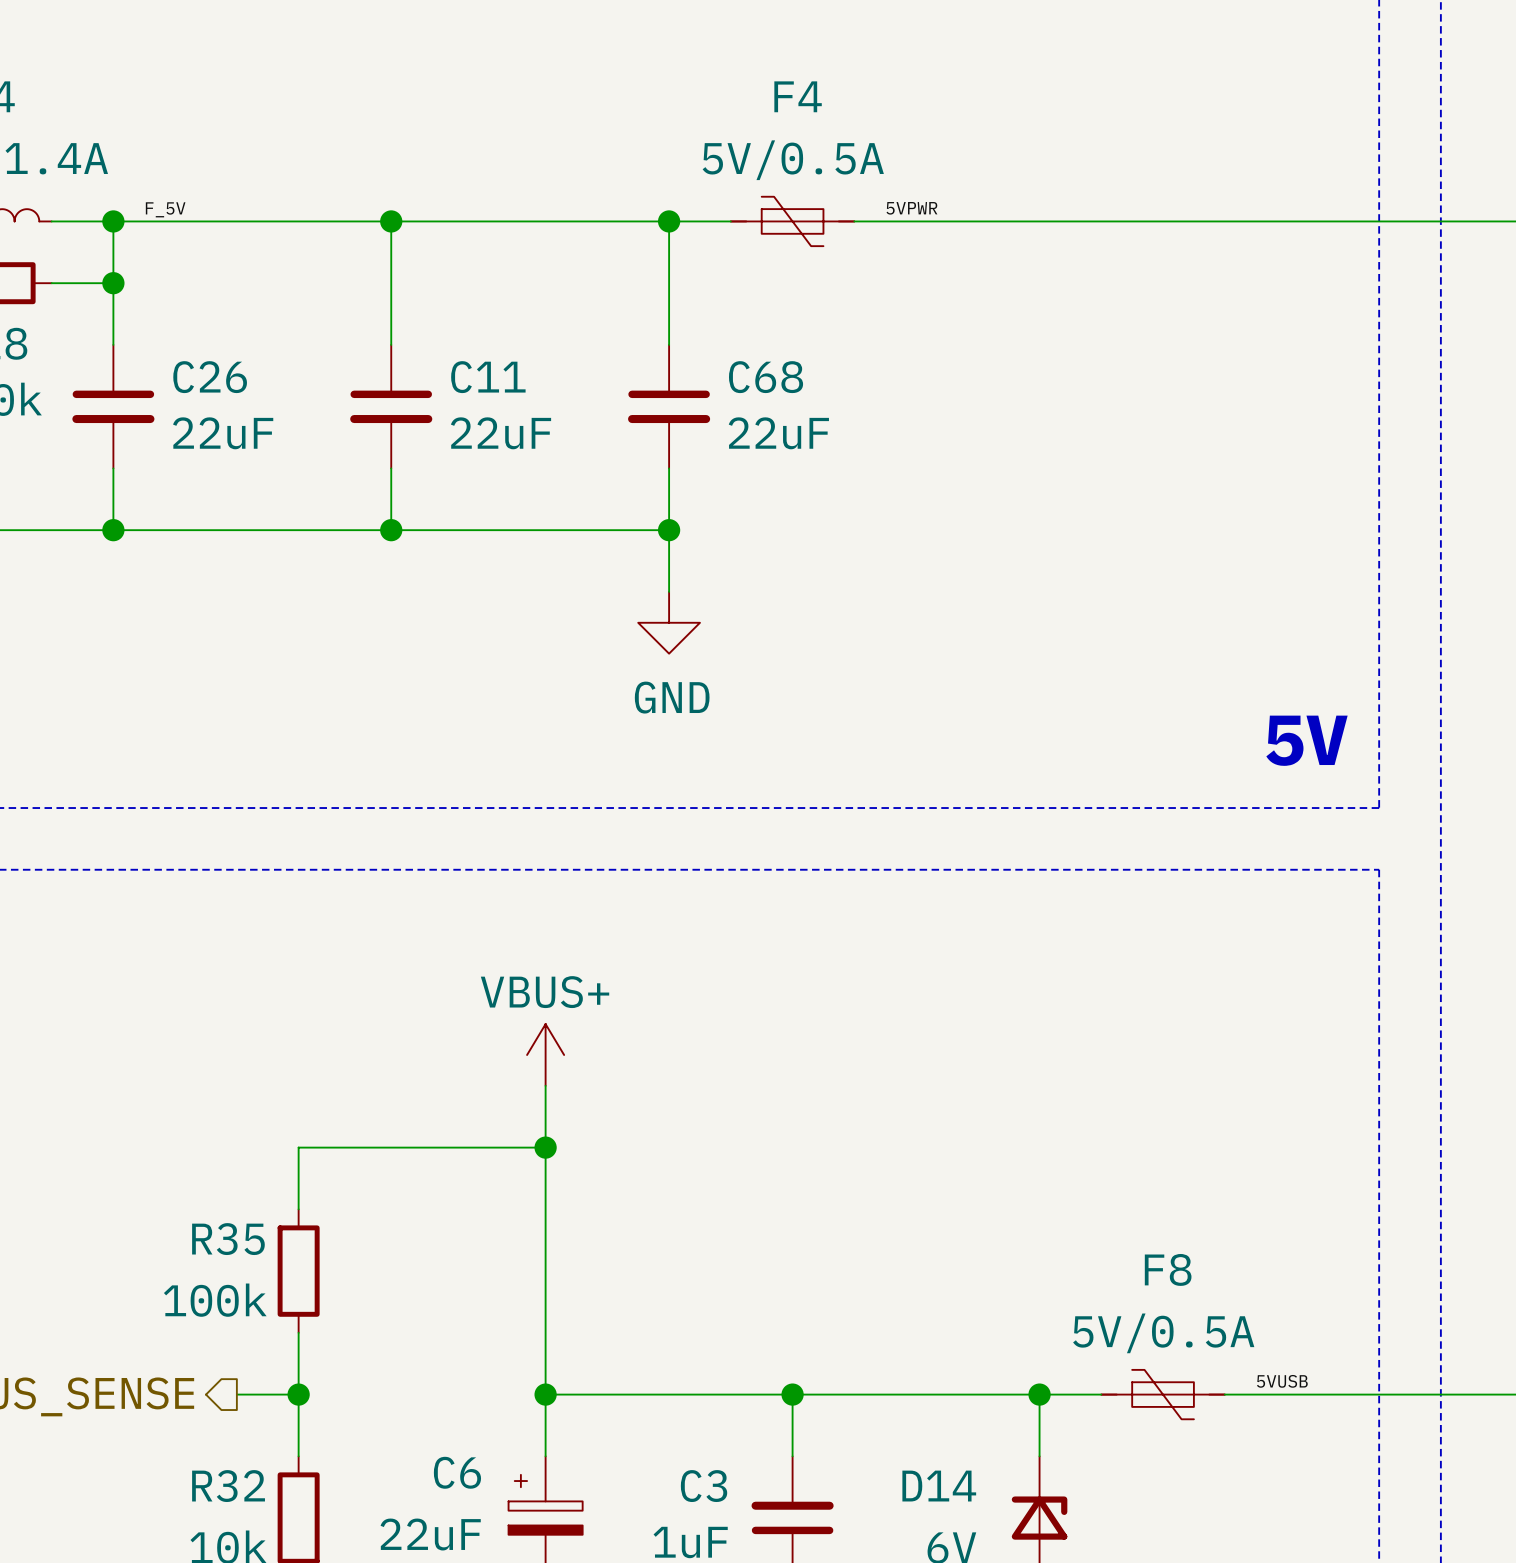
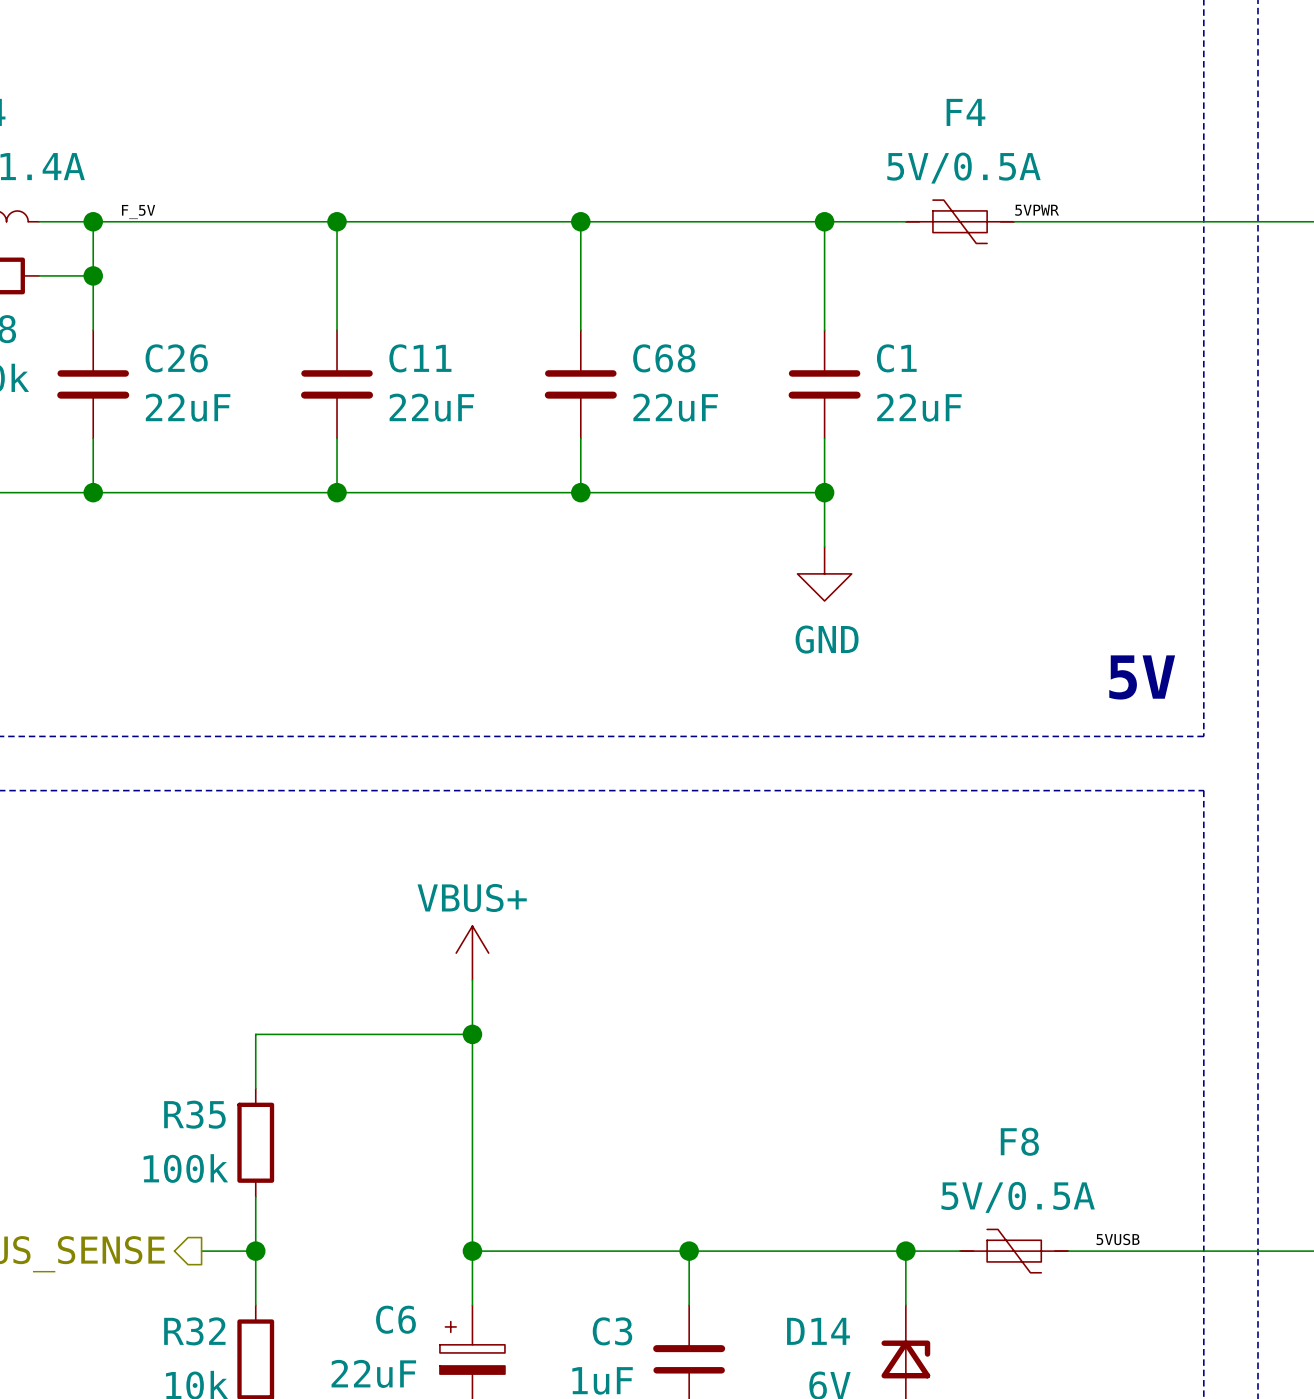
label position: 5VPWR (911, 208) -> 5VPWR (1037, 210)
F4 position: (792, 221) -> (960, 221)
wire: none -> (824, 221) (824, 330)
junction: none -> (824, 221)
C1: none -> 22uF (824, 384)
wire: none -> (824, 438) (824, 546)
wire: (669, 530) (669, 591) -> (580, 492) (824, 492)
junction: none -> (824, 492)
power symbol position: GND (669, 622) -> GND (824, 573)

